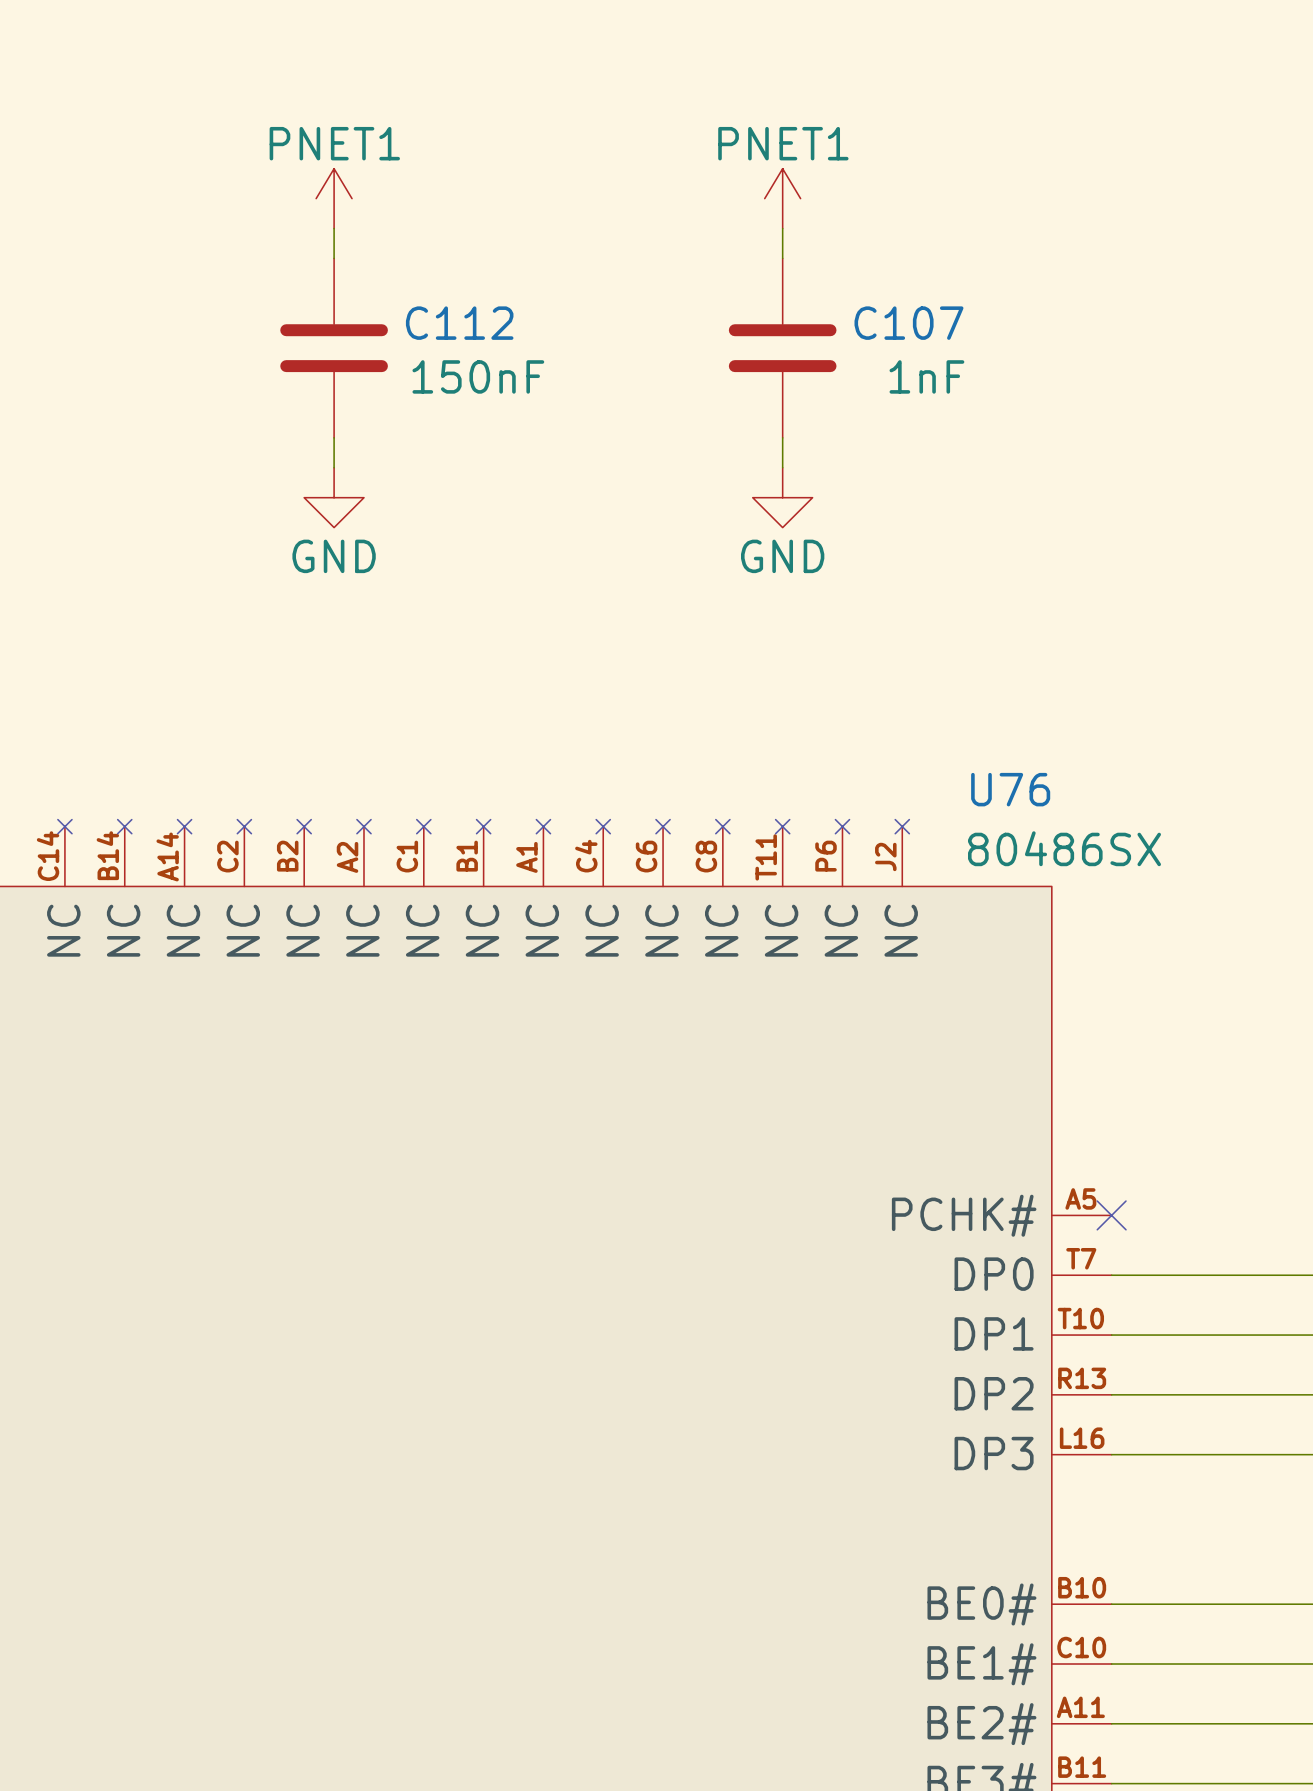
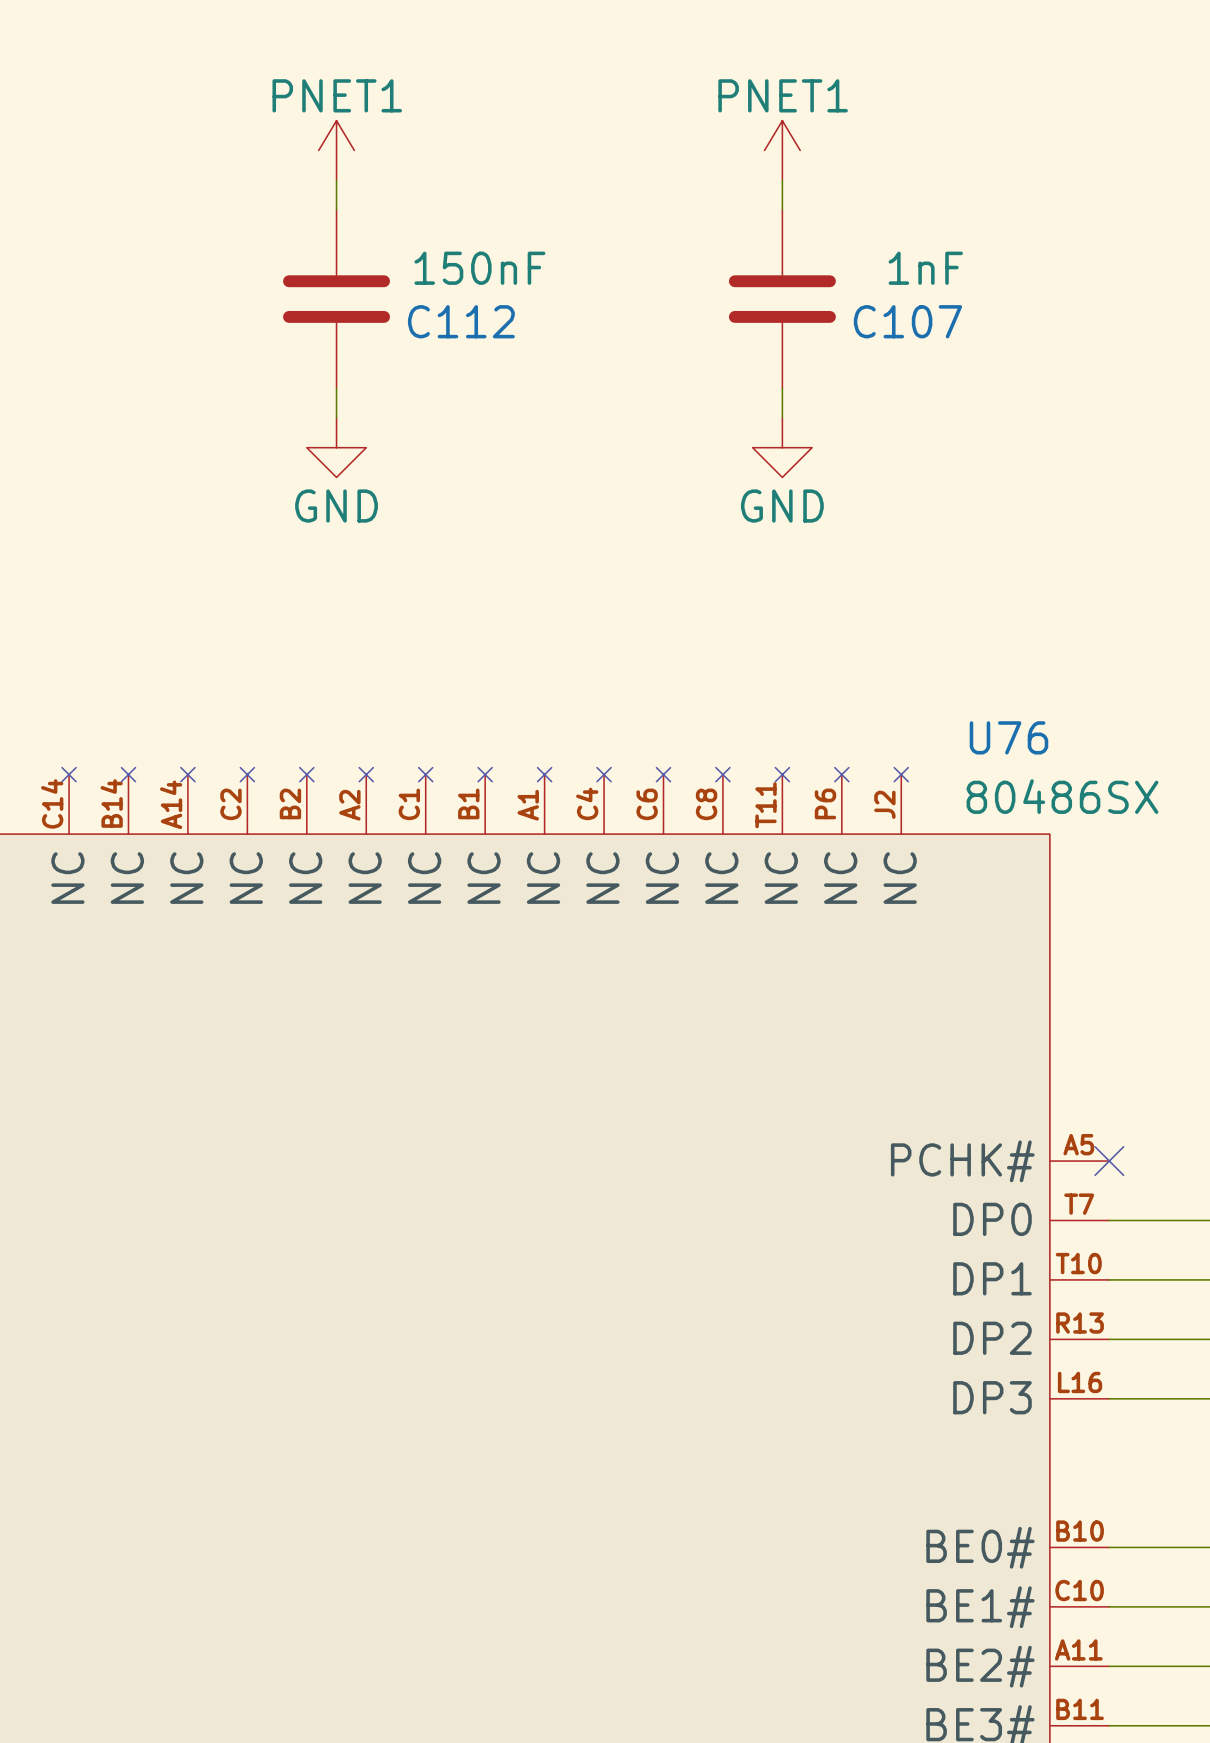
C112 name position: C112 (459, 323) -> C112 (461, 321)
C107 name position: C107 (908, 323) -> C107 (907, 321)
C112 value position: 150nF (478, 376) -> 150nF (479, 268)
C107 value position: 1nF (926, 376) -> 1nF (925, 268)

